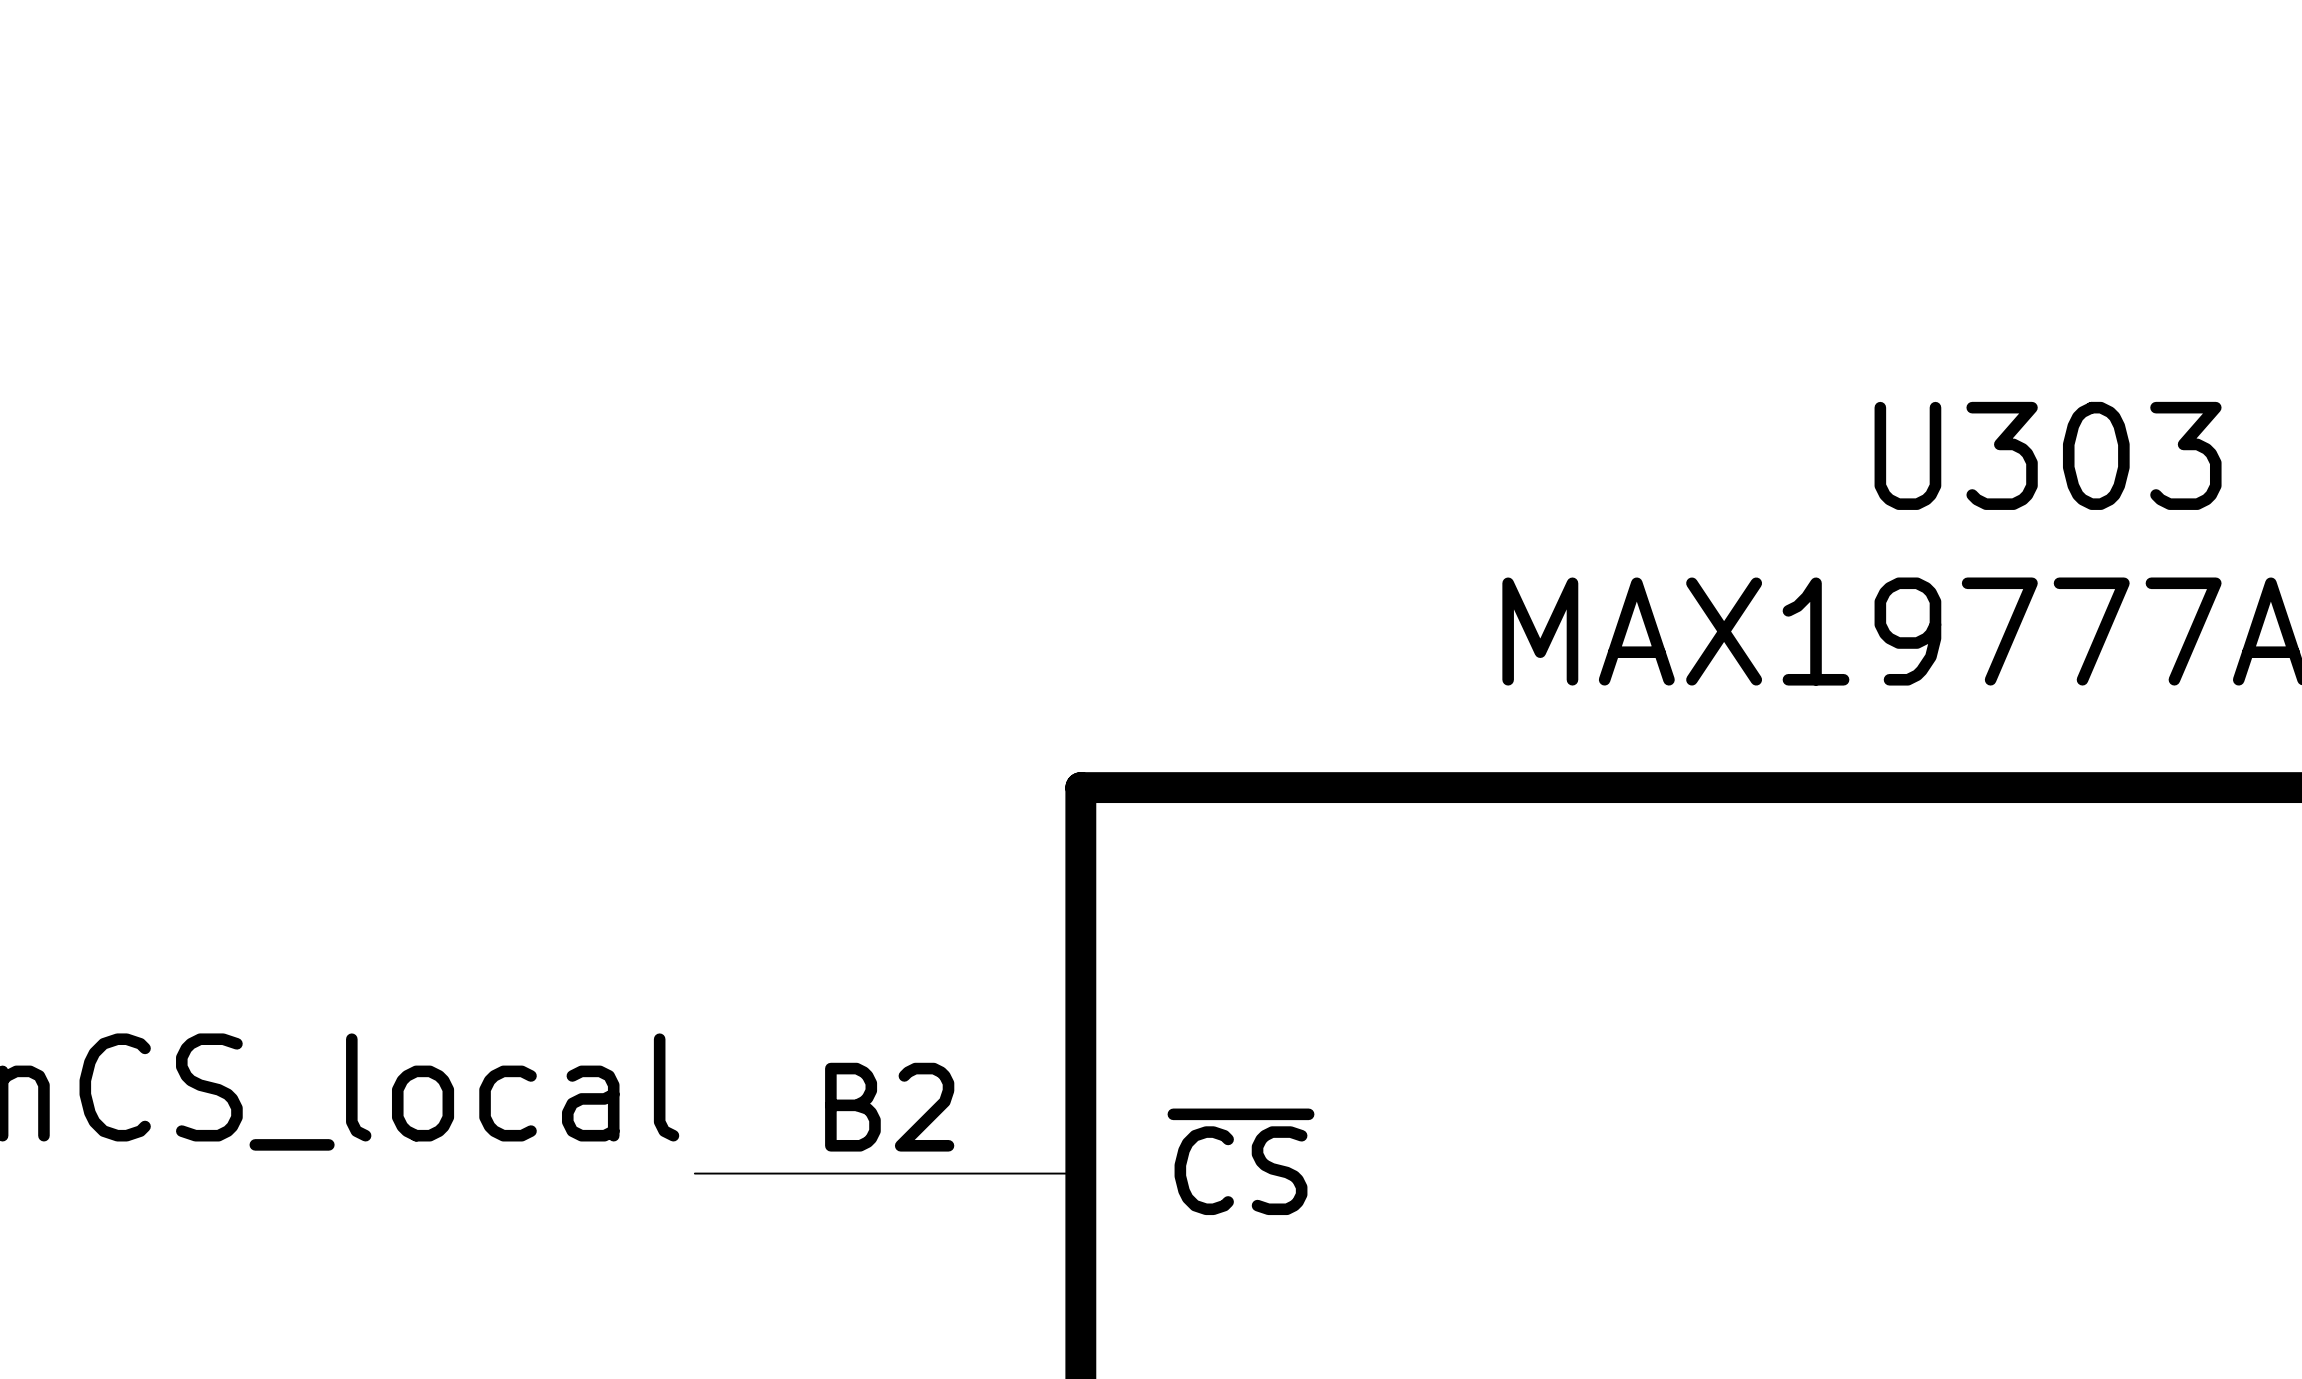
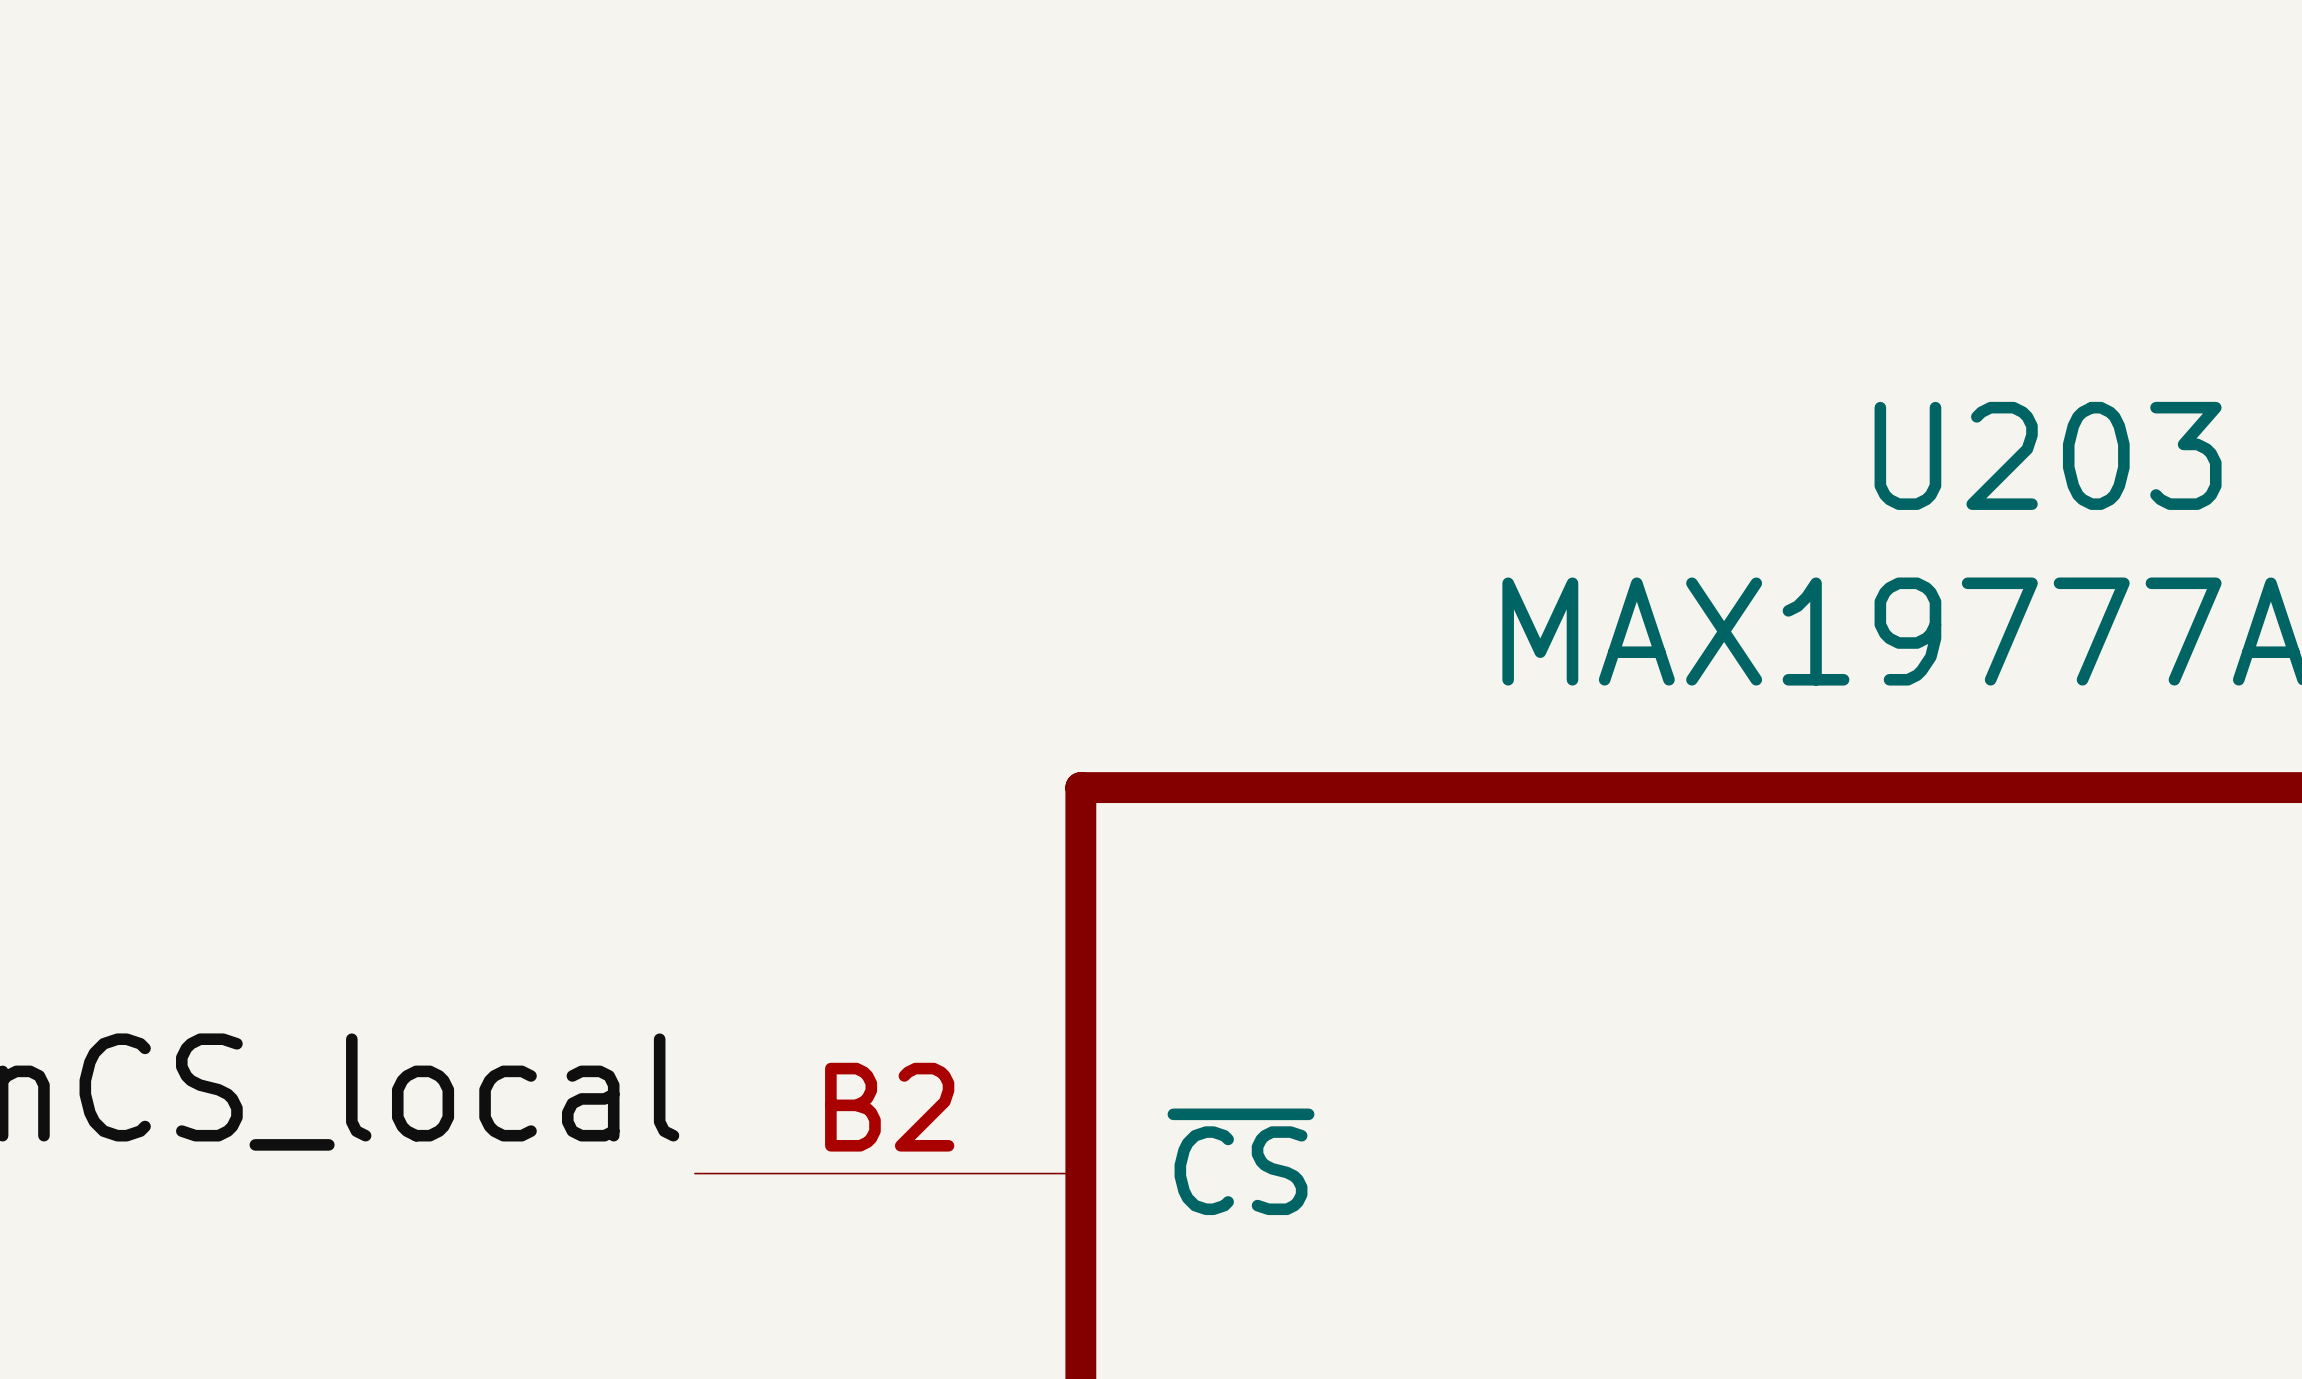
U303 name: U303 (2048, 455) -> U203 (2048, 455)

